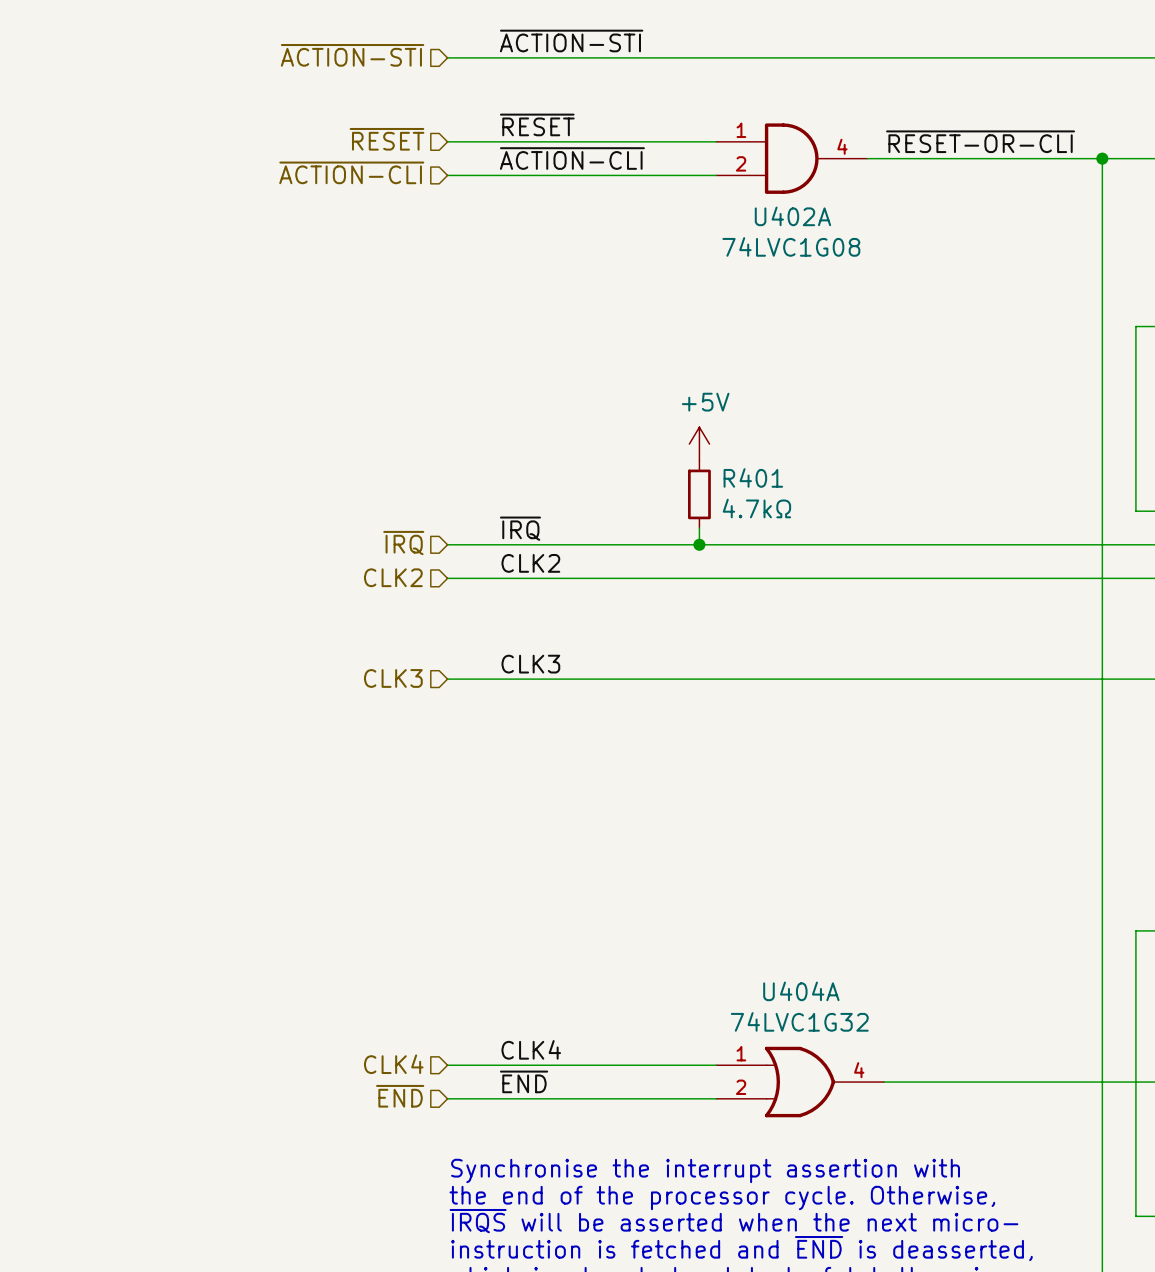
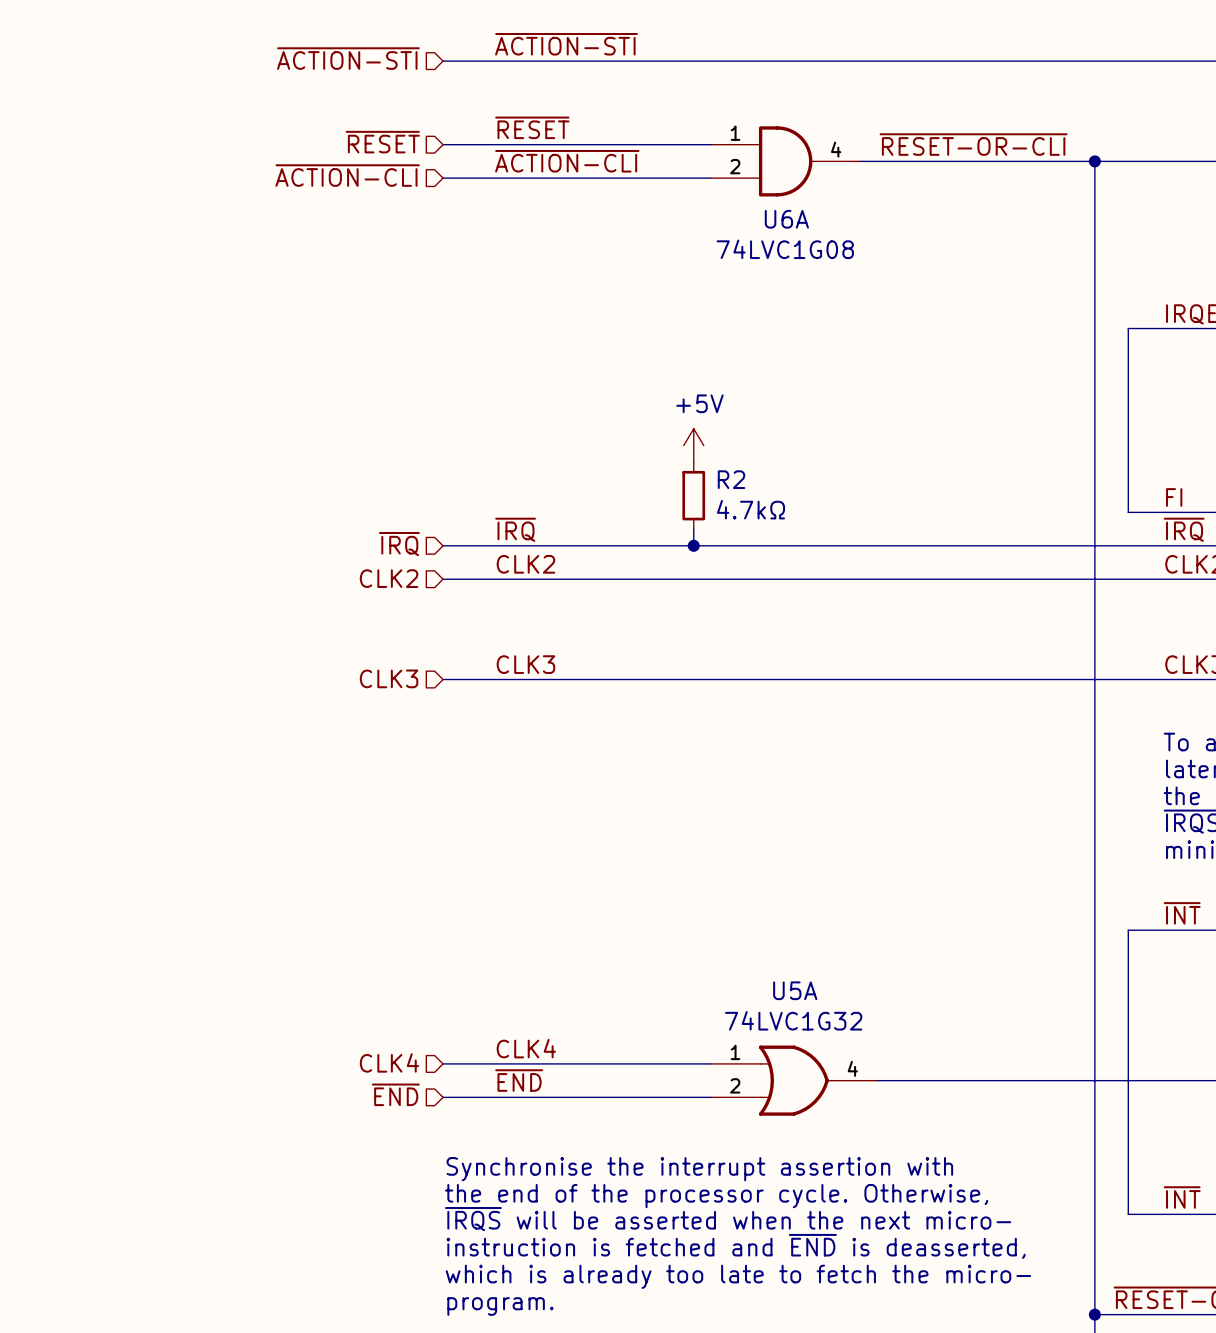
U402A name: U402A (792, 216) -> U6A (786, 219)
R401 name: R401 (753, 477) -> R2 (731, 479)
U404A name: U404A (801, 991) -> U5A (795, 990)

